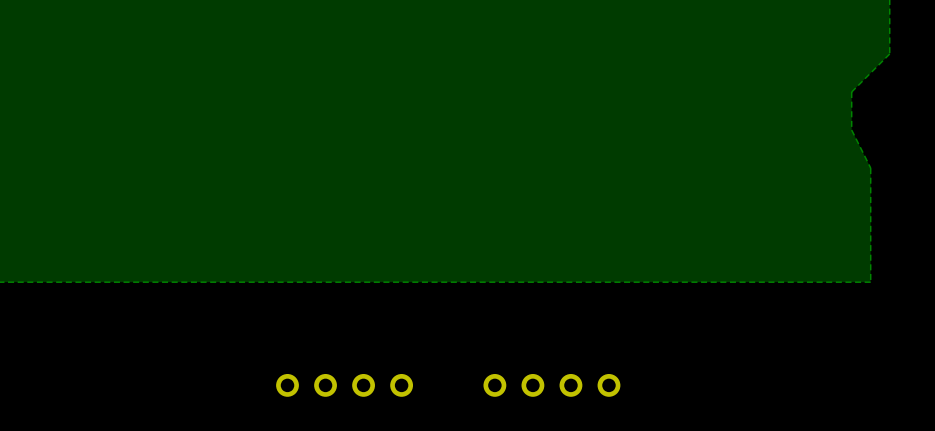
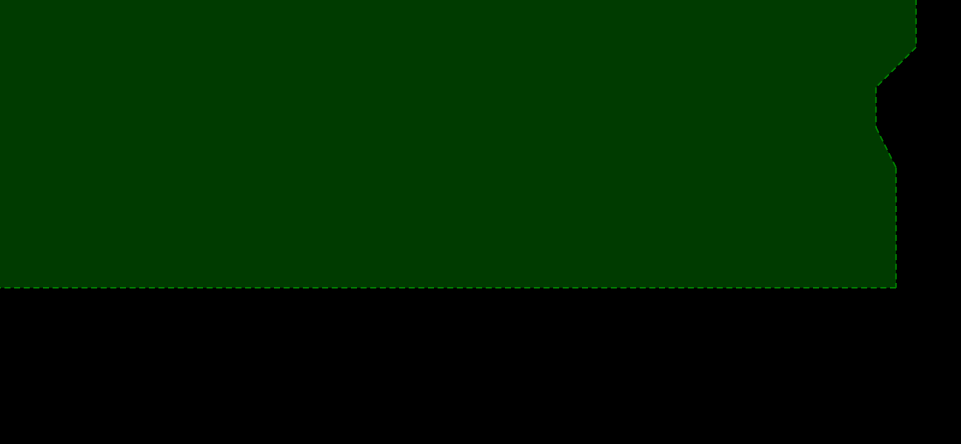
part: (344, 385) -> none
part: (551, 385) -> none

